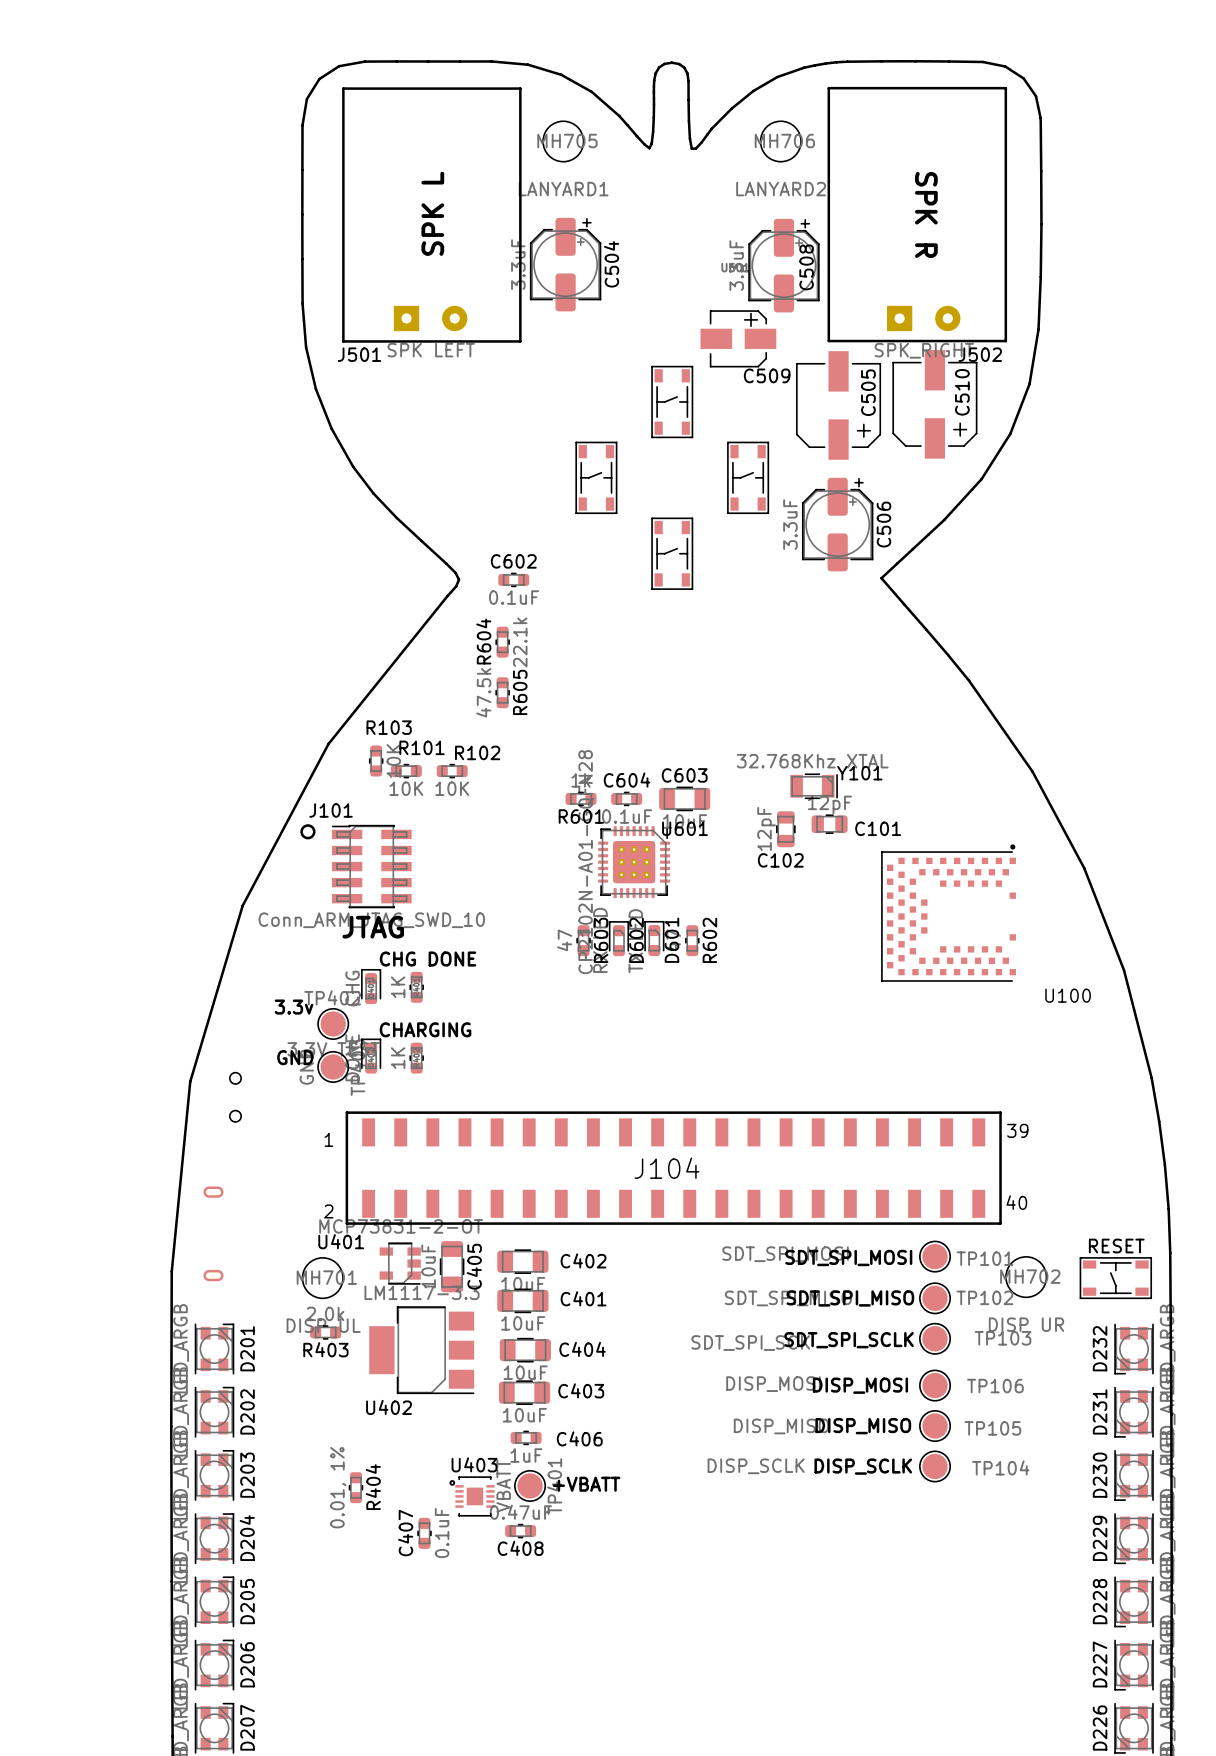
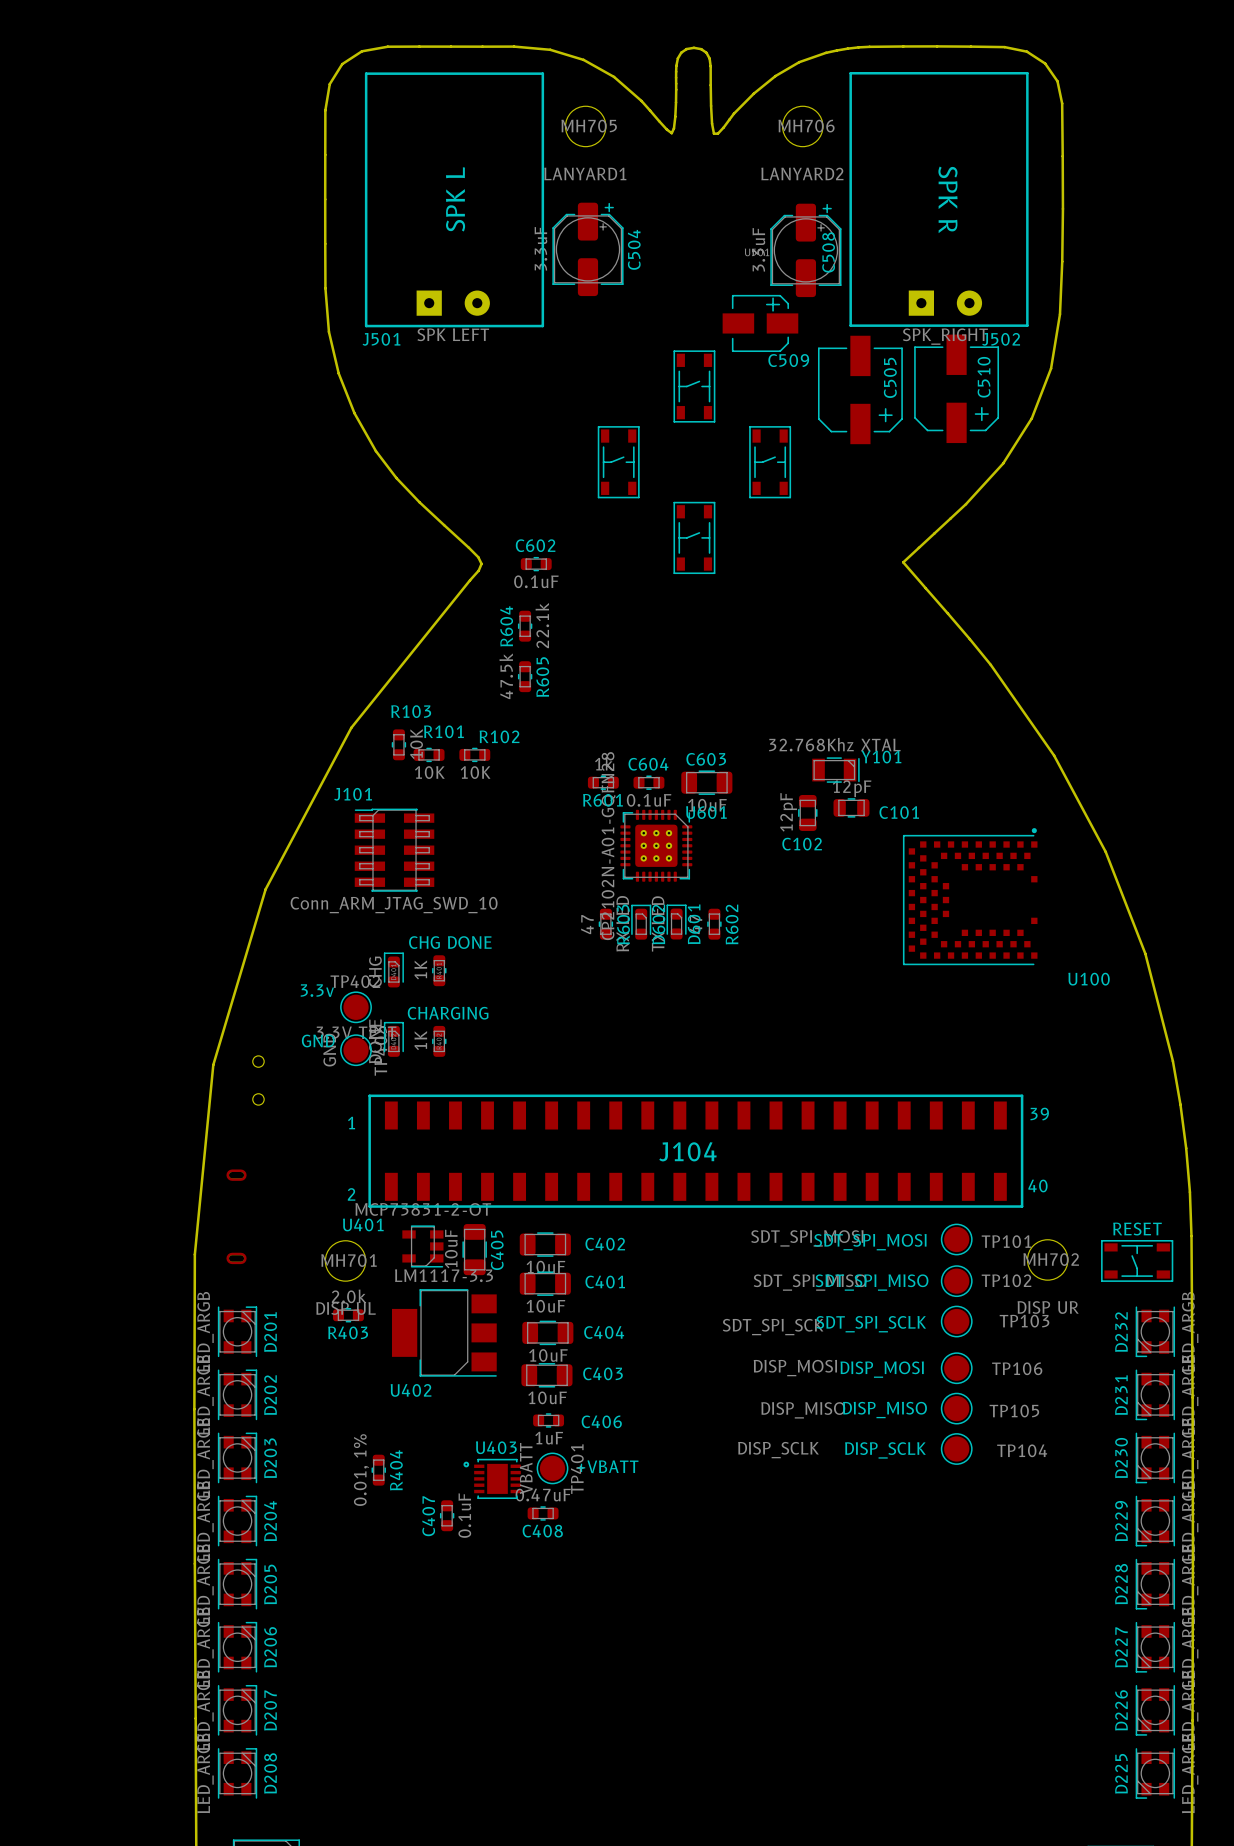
C506: 3.3uF (837, 524) -> none
drawing: [300, 824, 316, 840] -> none
text: JTAG (373, 927) -> none
U403 footprint: [449, 1476, 495, 1517] -> [463, 1458, 521, 1500]

